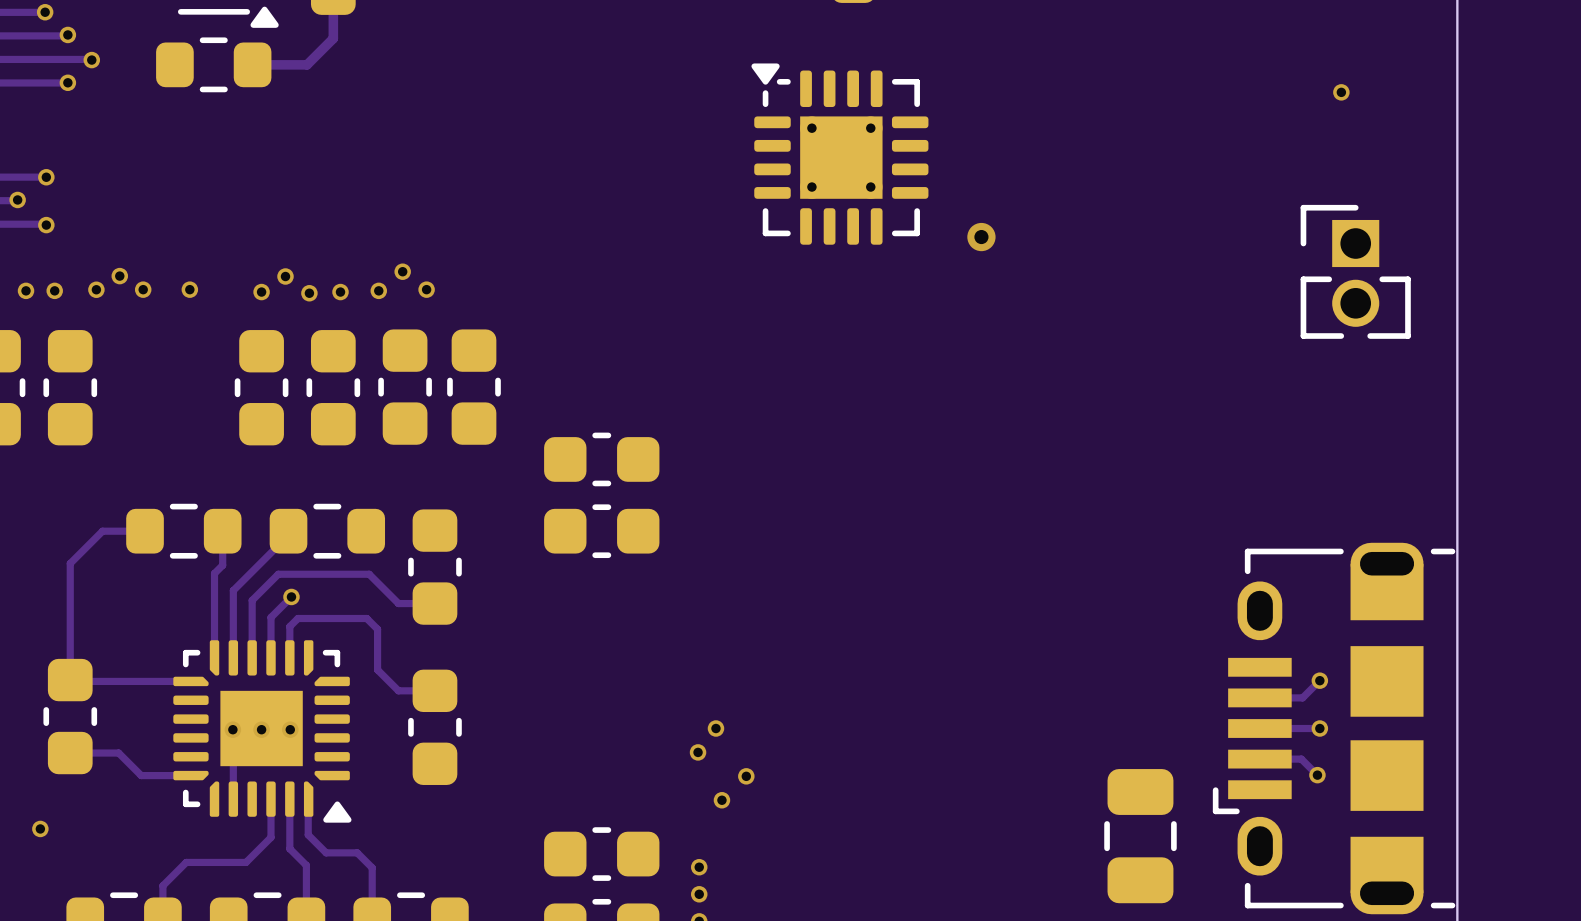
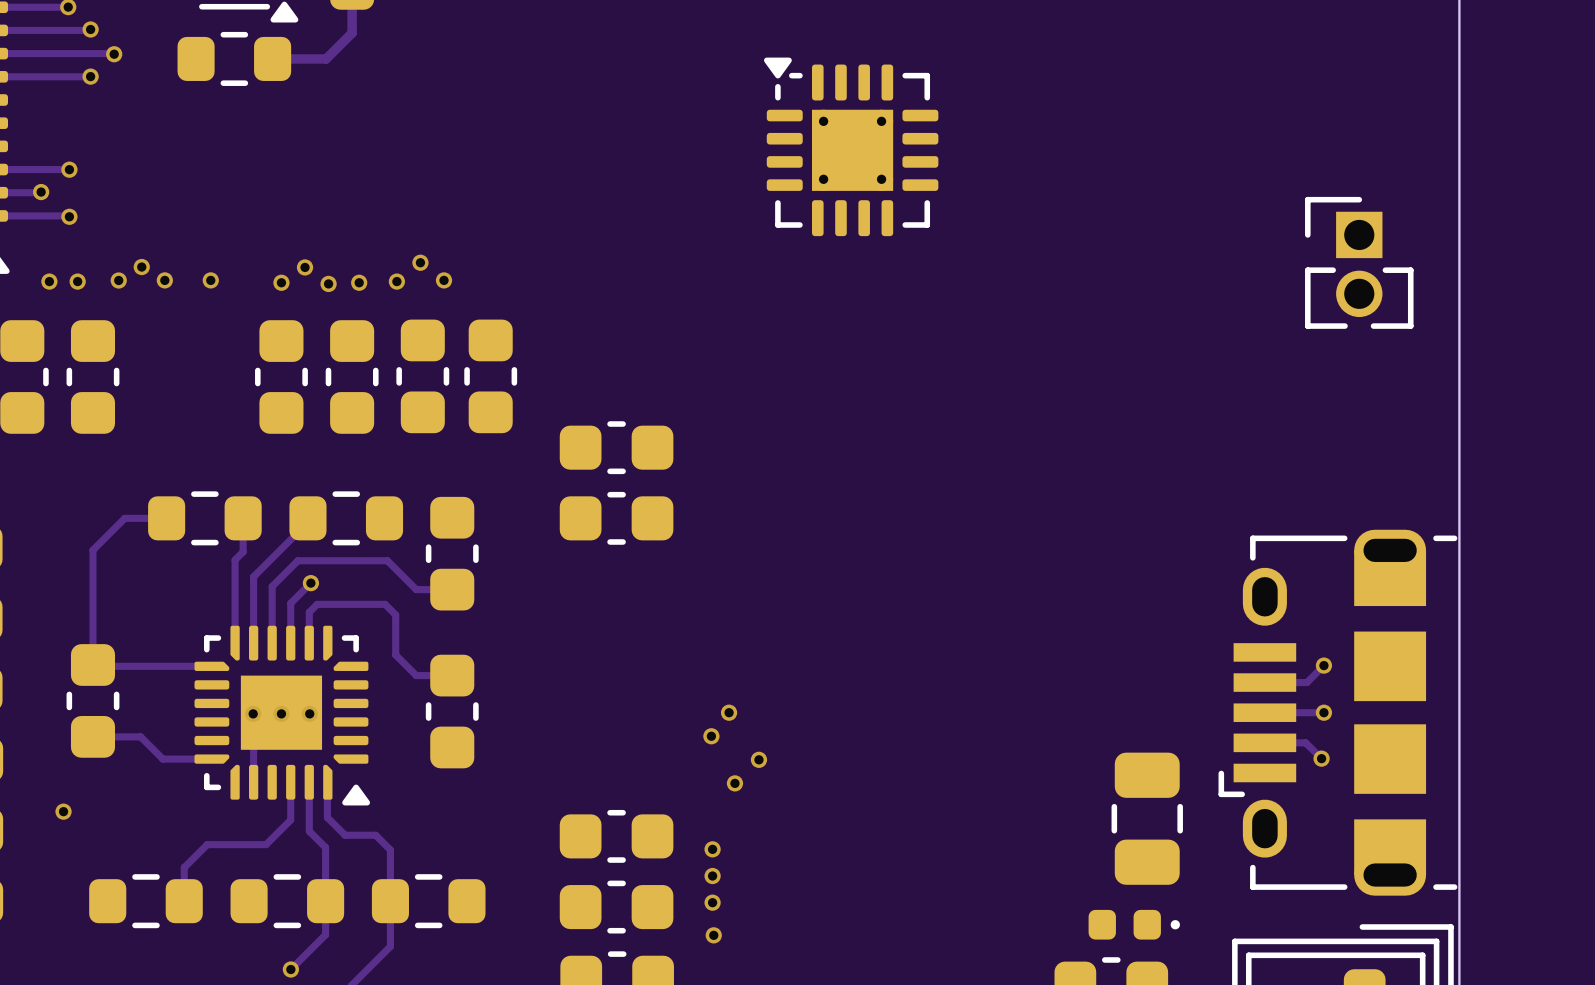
via: (1341, 92) -> none
via: (981, 237) -> none

